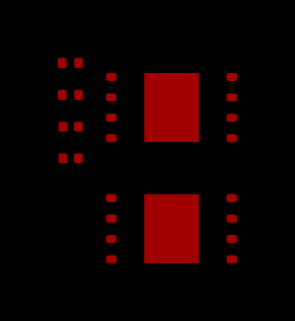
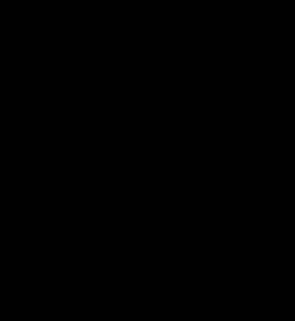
part: (70, 62) -> none
part: (70, 94) -> none
part: (171, 107) -> none
part: (70, 126) -> none
part: (70, 158) -> none
part: (171, 228) -> none

